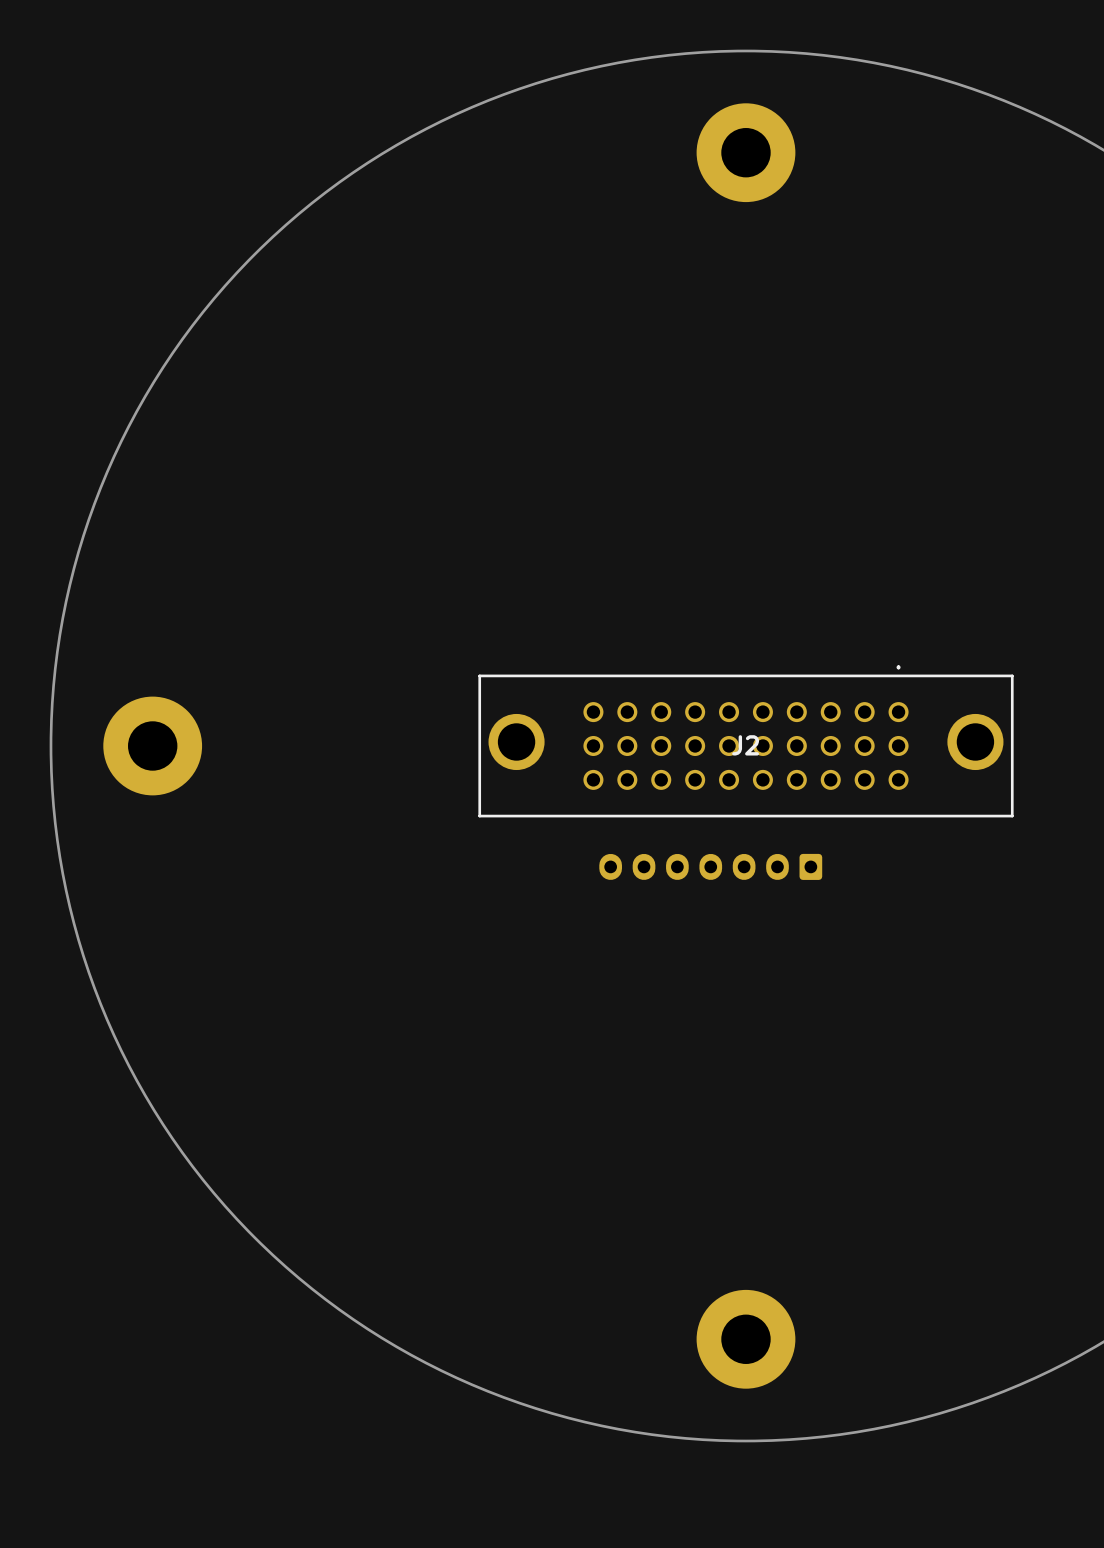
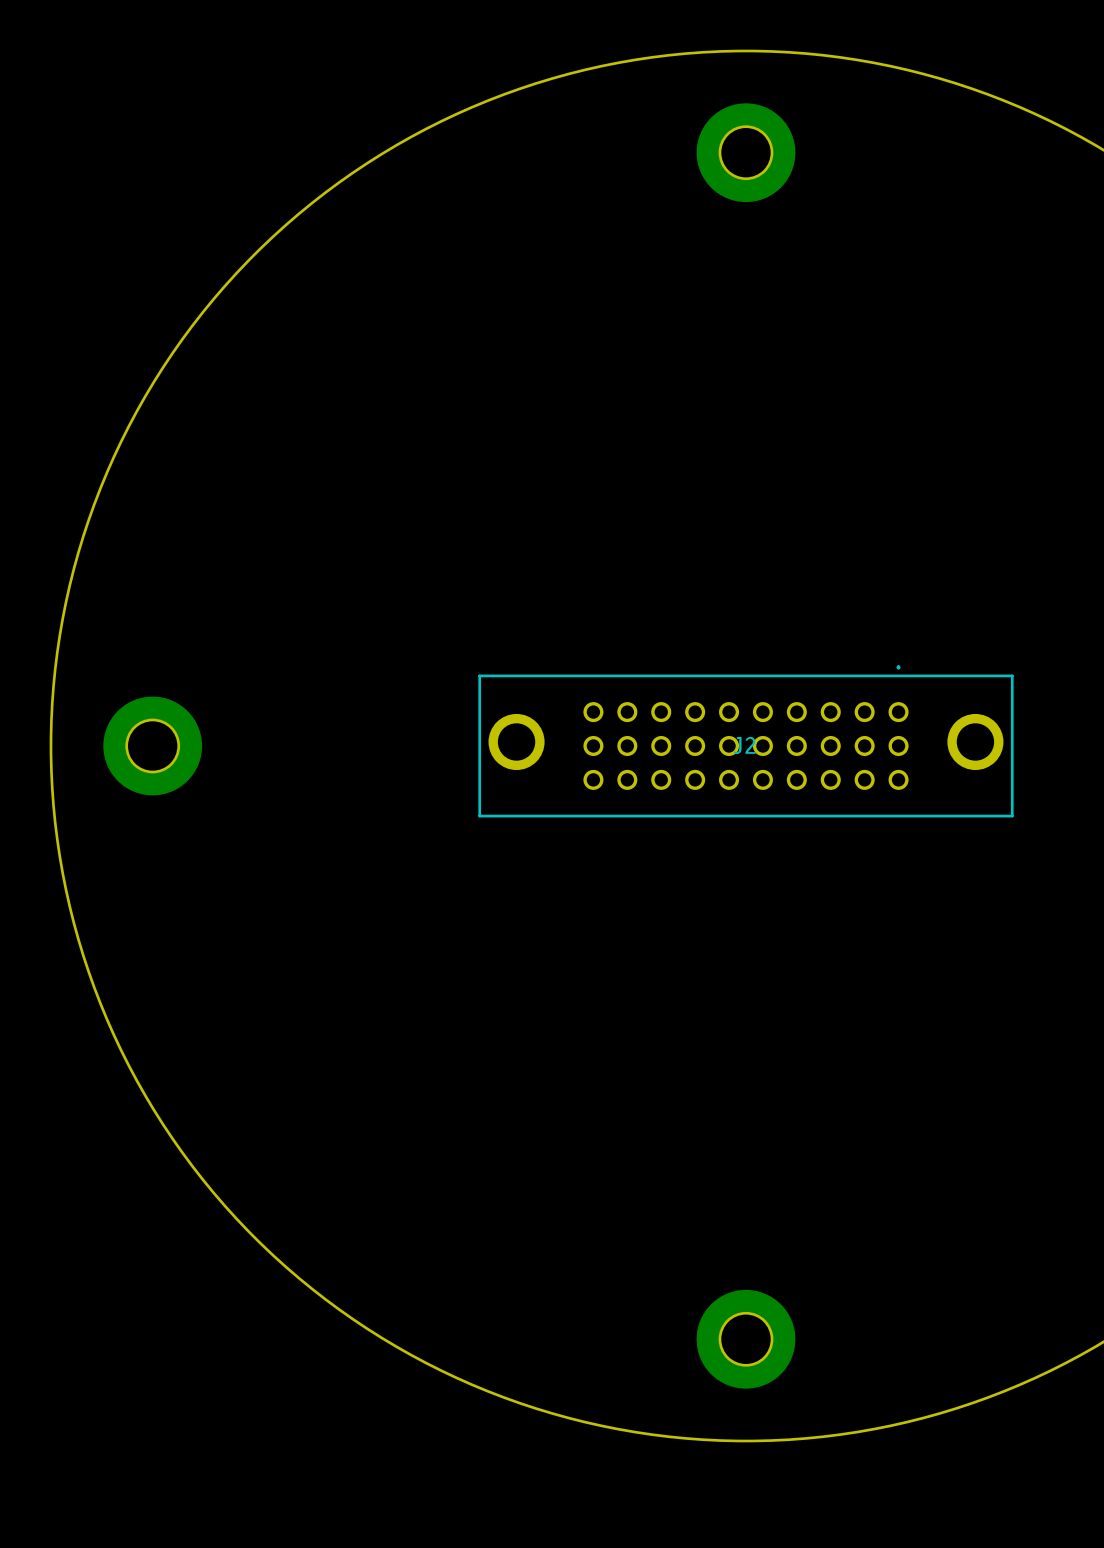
part: (710, 866) -> none

